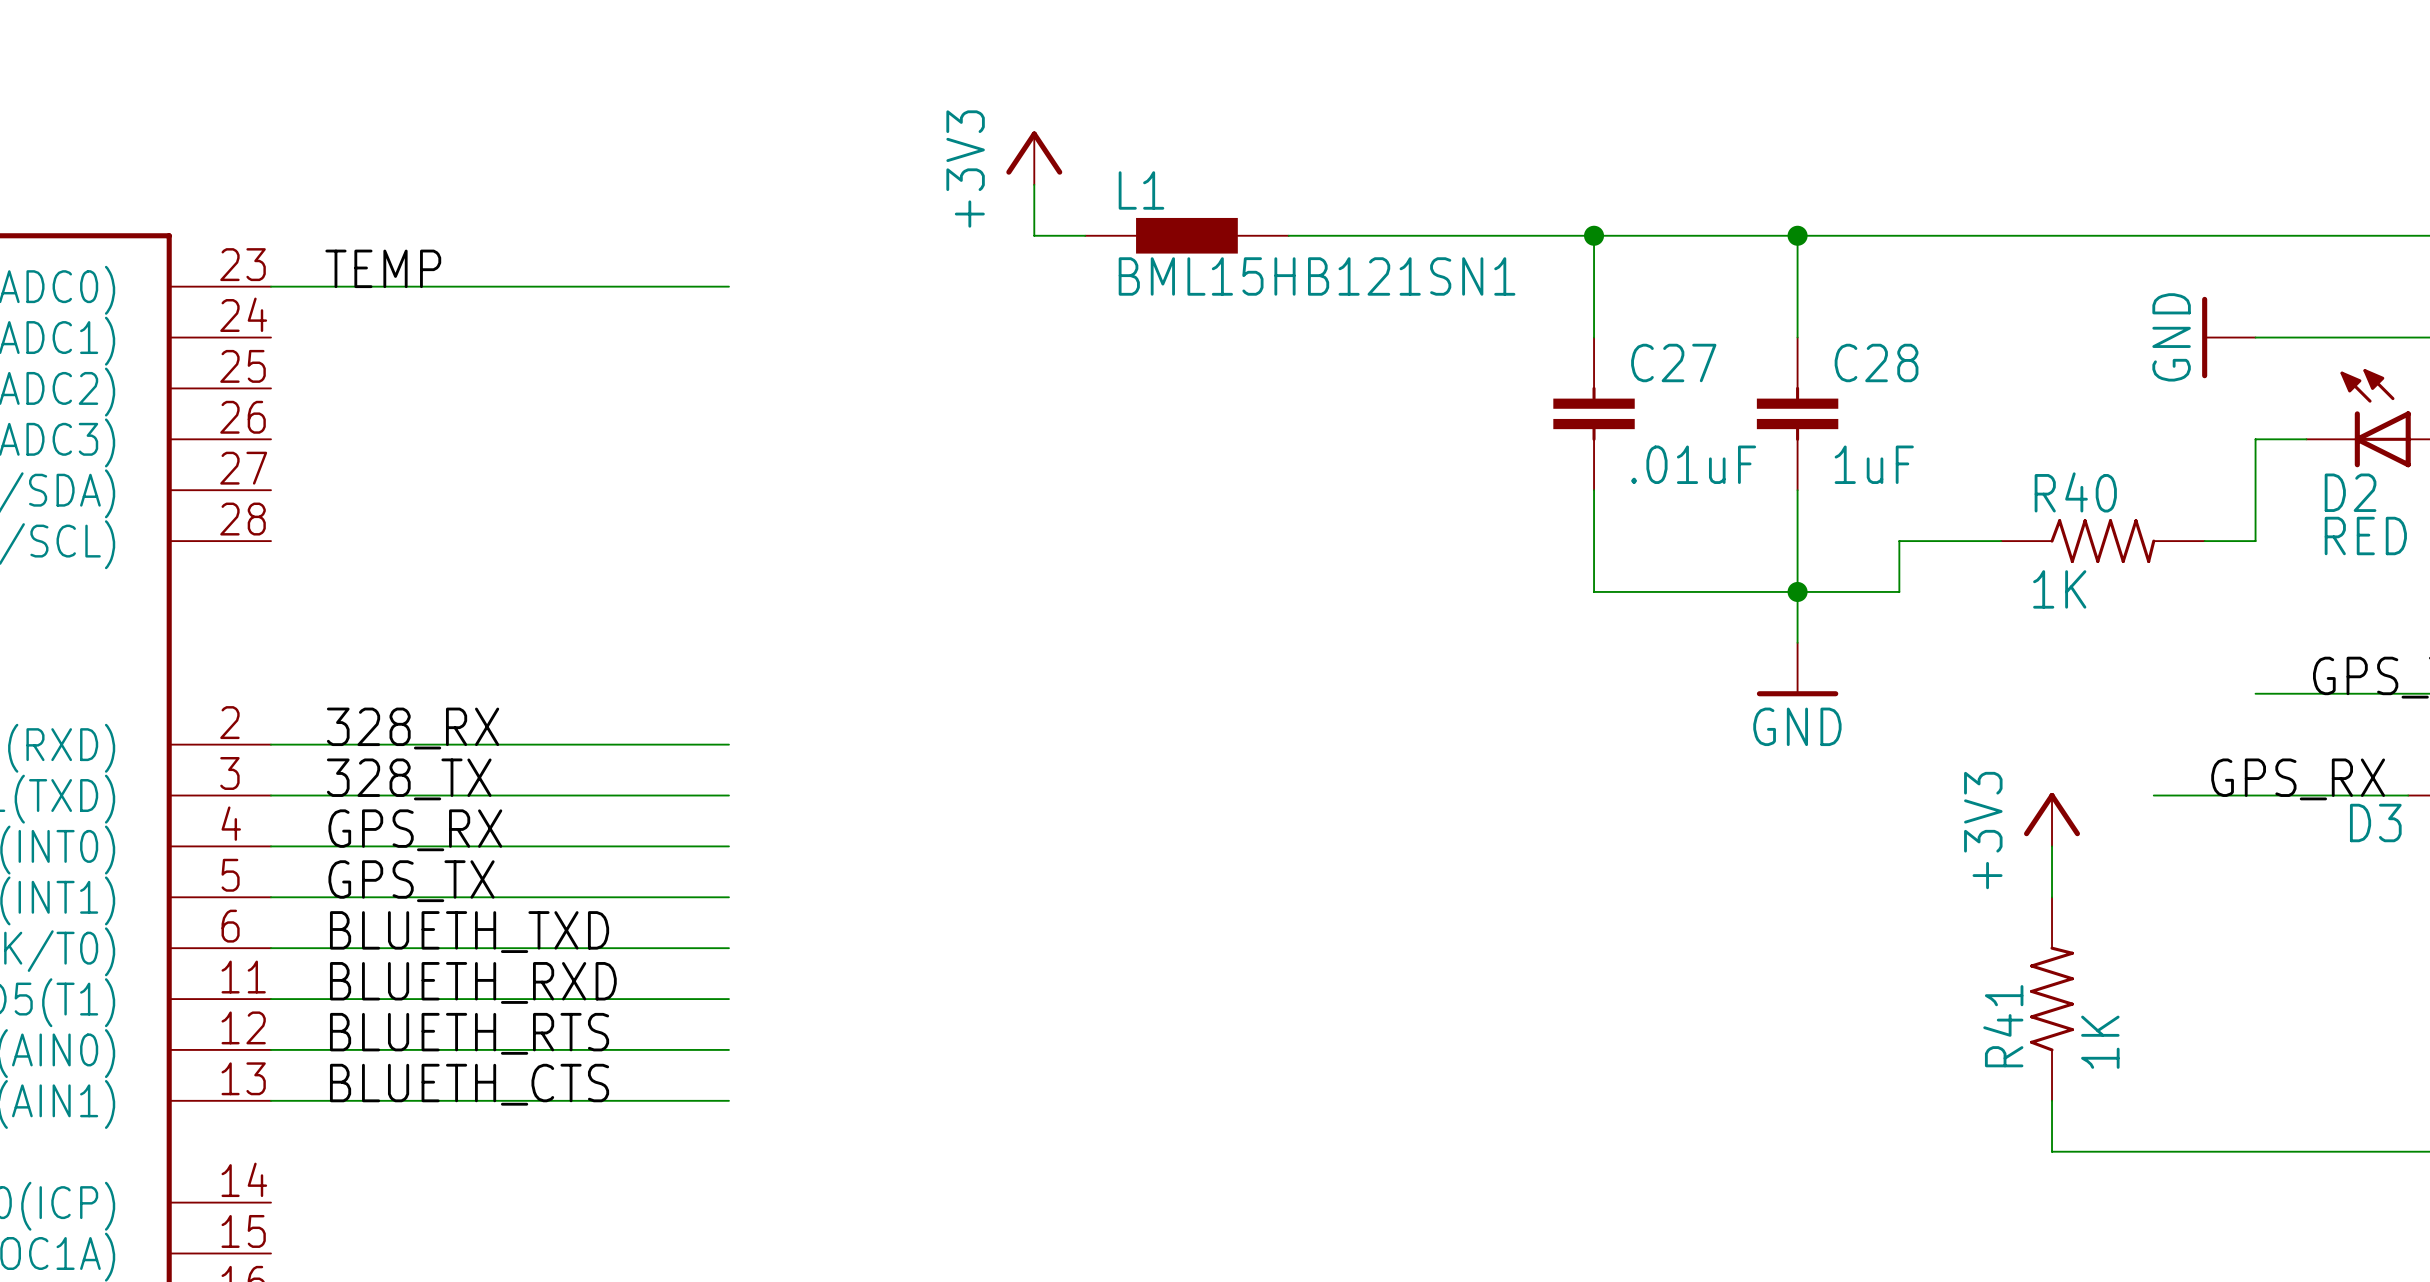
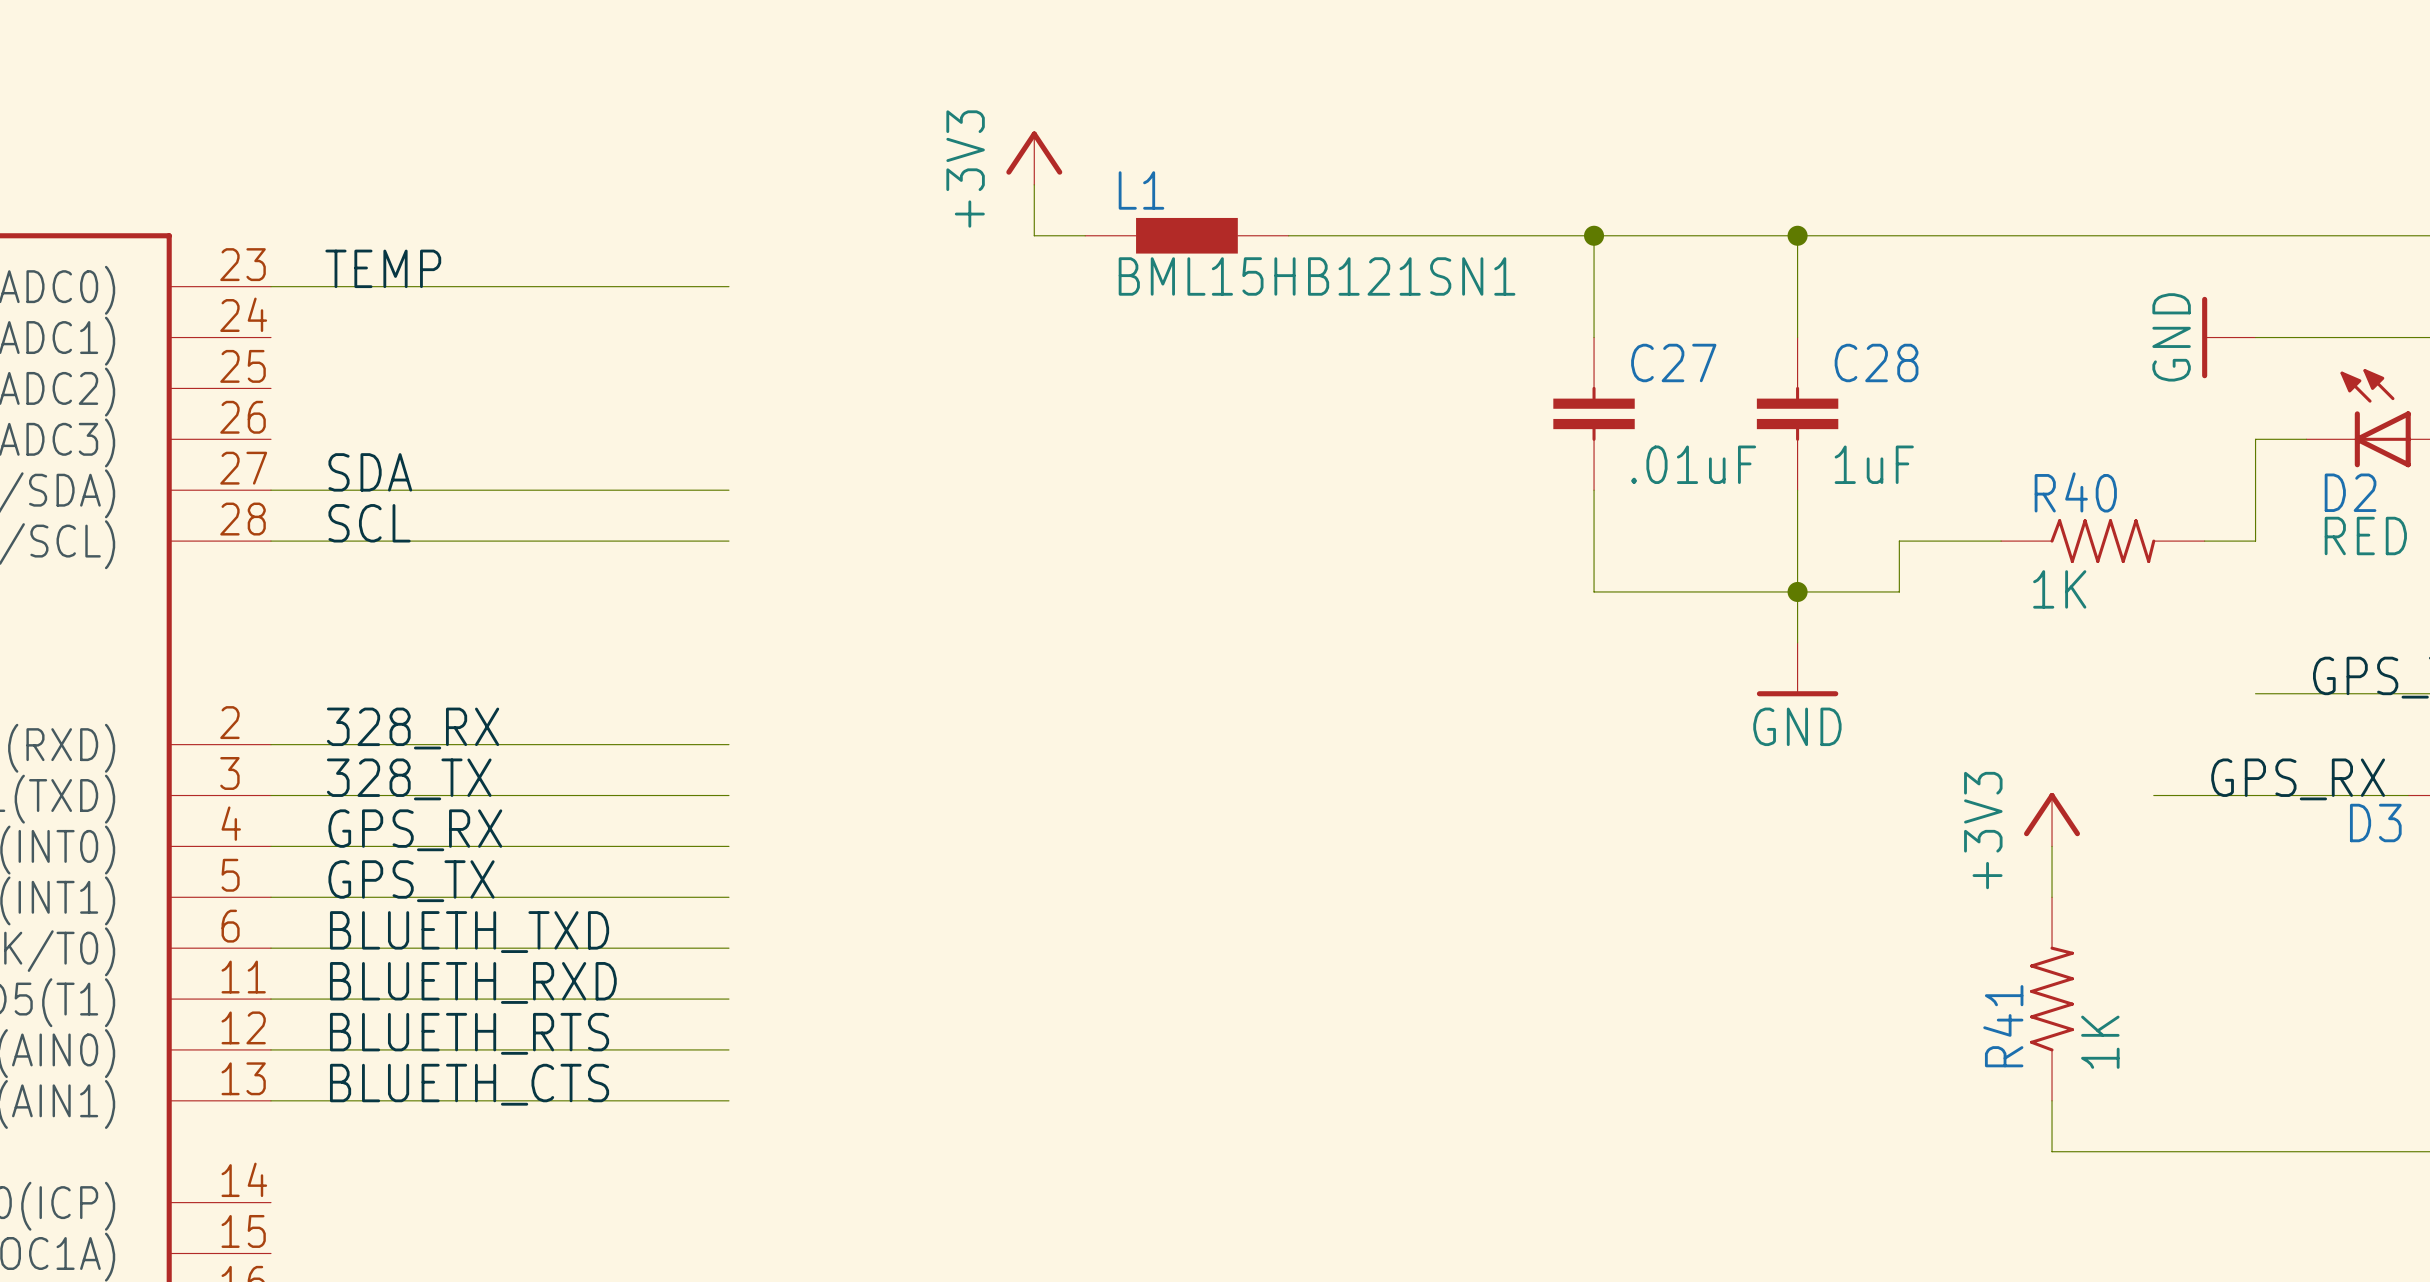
label: none -> SDA (370, 472)
wire: none -> (270, 490) (728, 490)
label: none -> SCL (369, 523)
wire: none -> (270, 541) (728, 541)

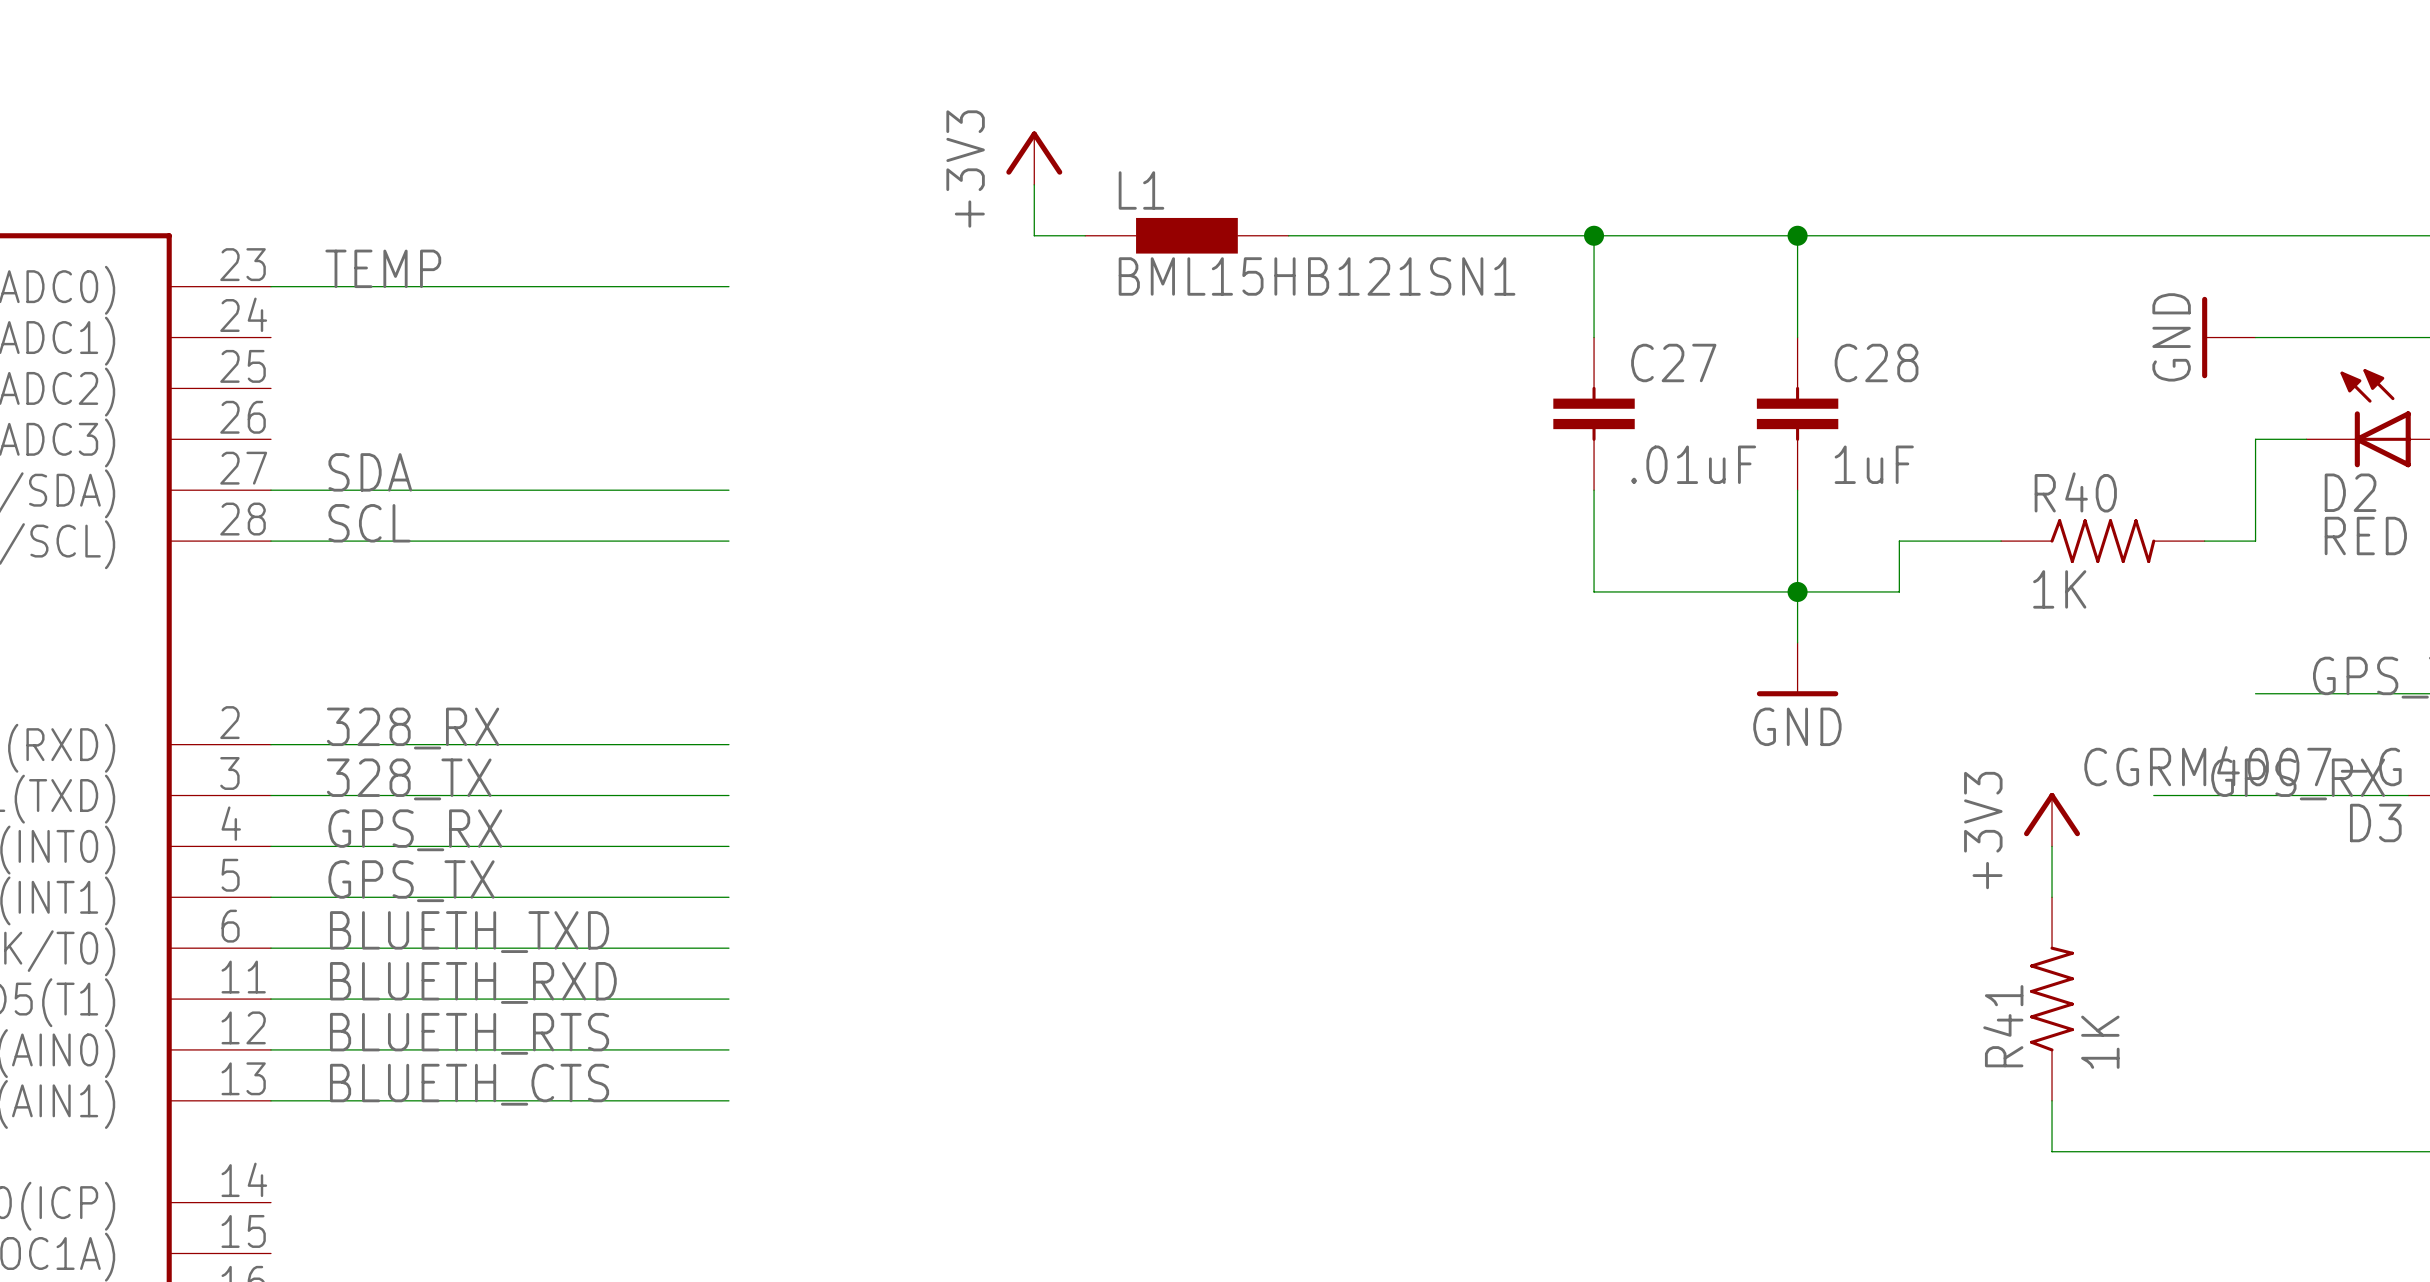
D3 value: none -> CGRM4007-G (2242, 766)

